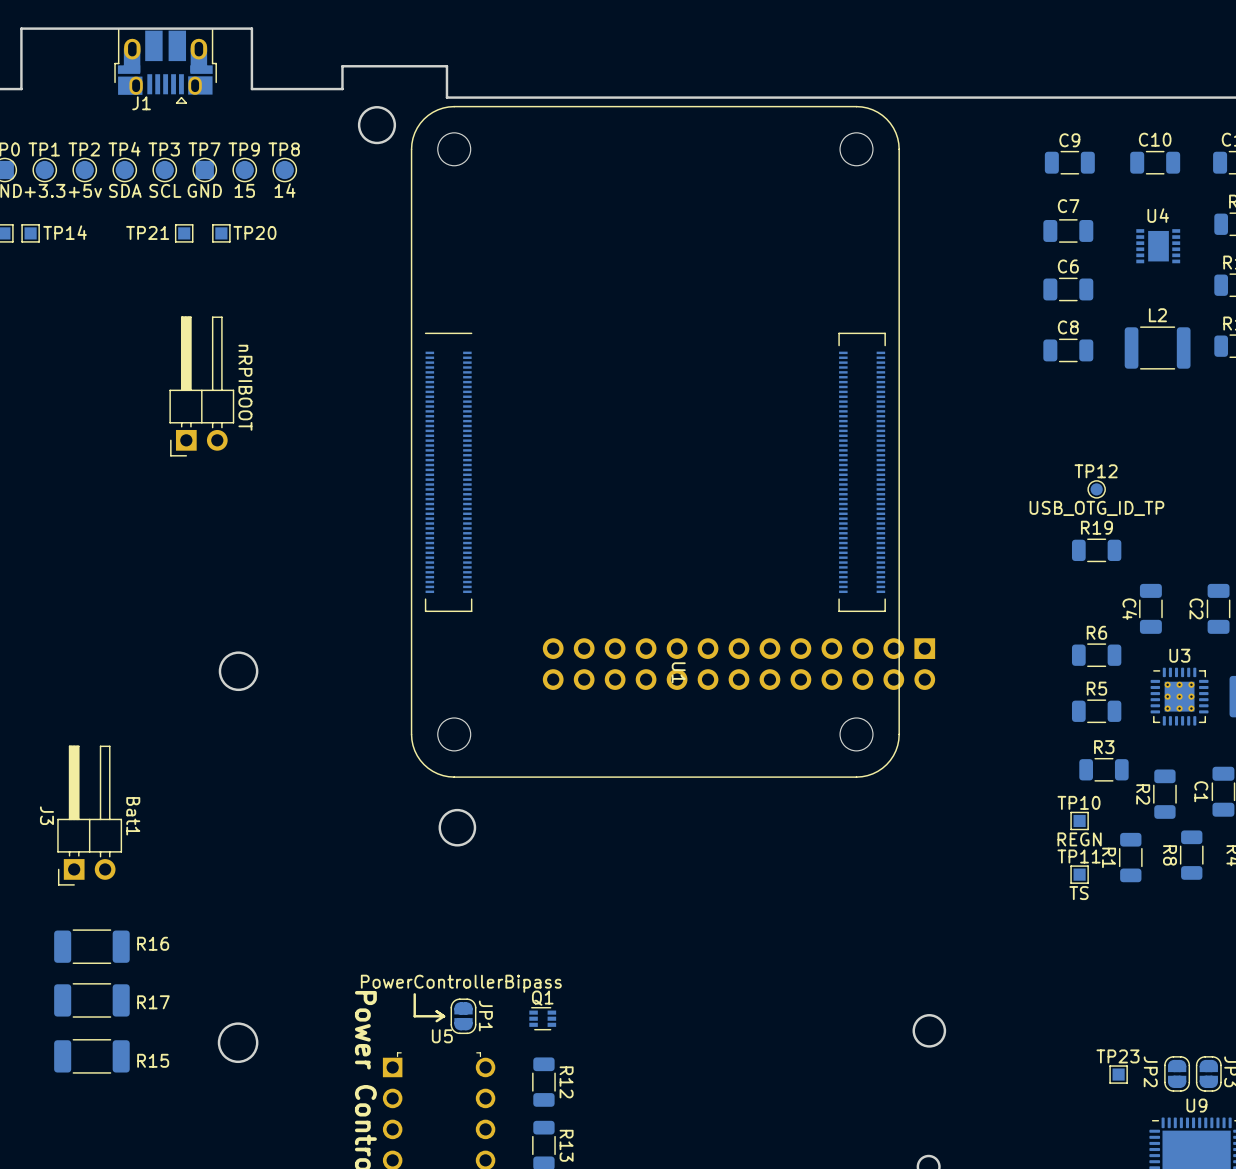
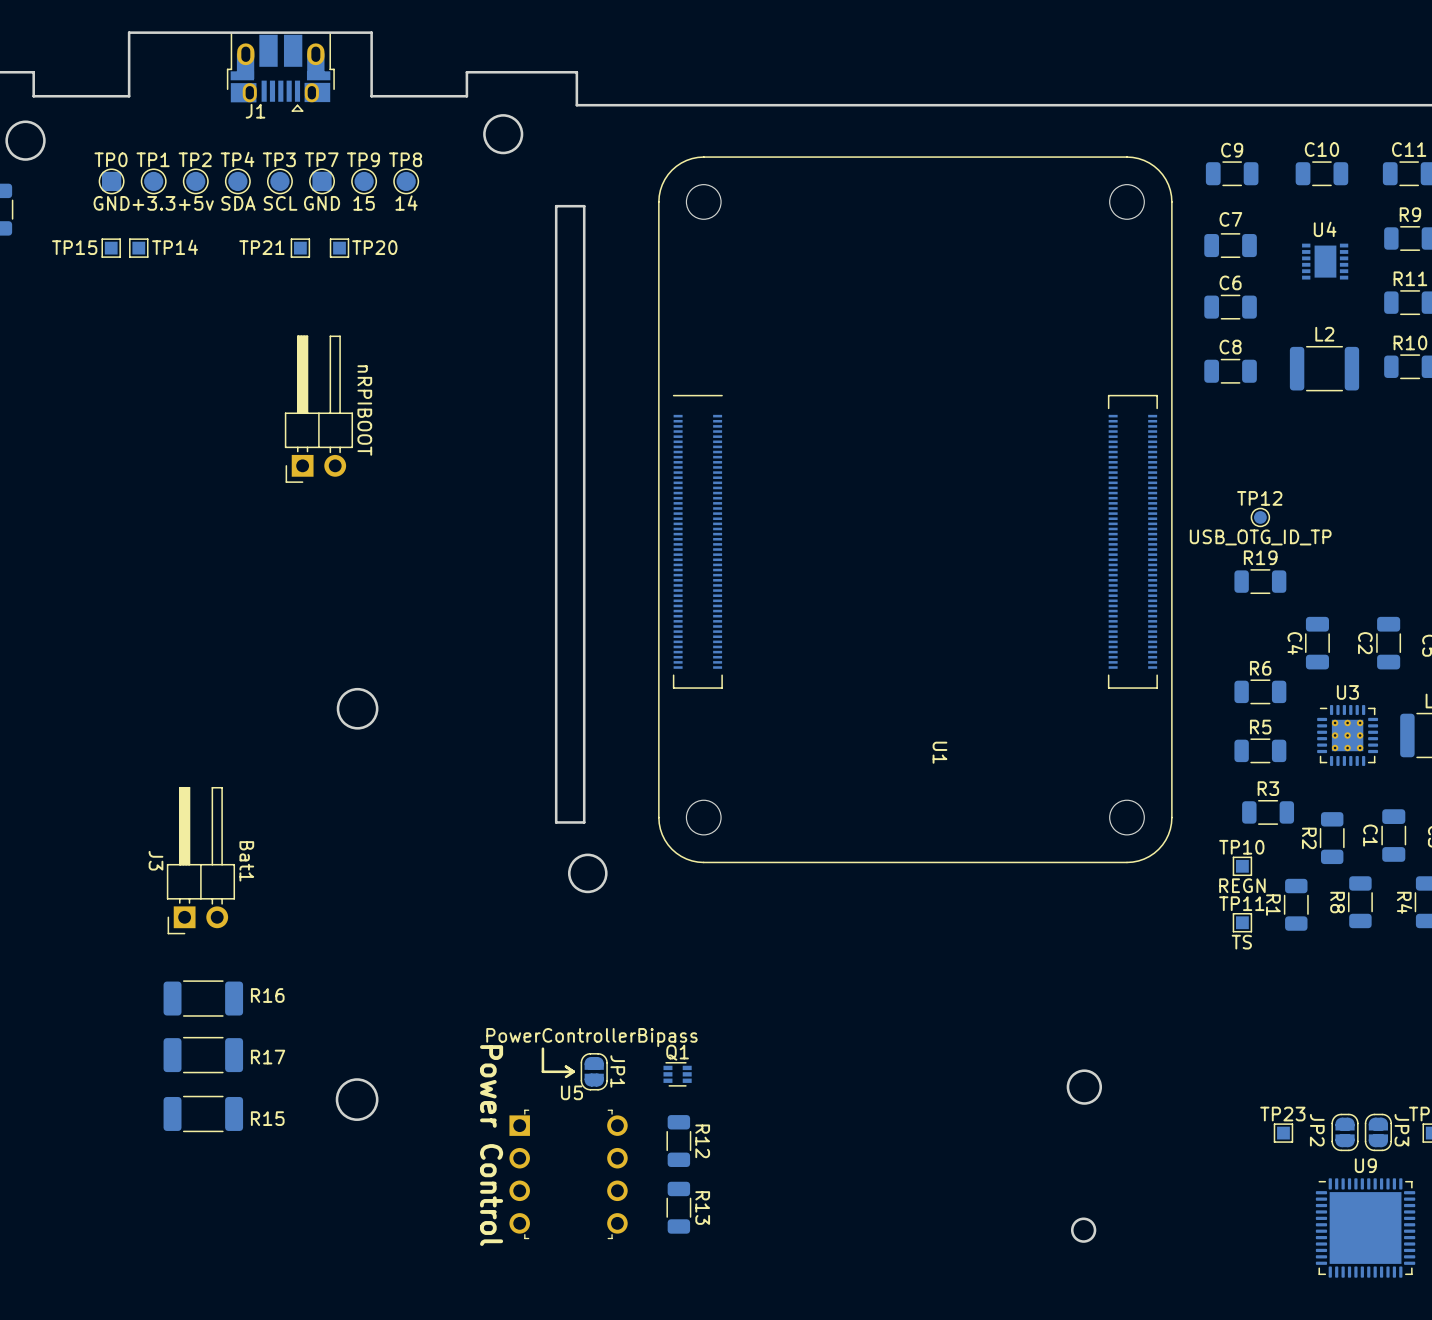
board edge: none -> (584, 206) (584, 822) (556, 822) (556, 206) (584, 206)
U1 position: (655, 441) -> (915, 509)
part: (738, 664) -> none

